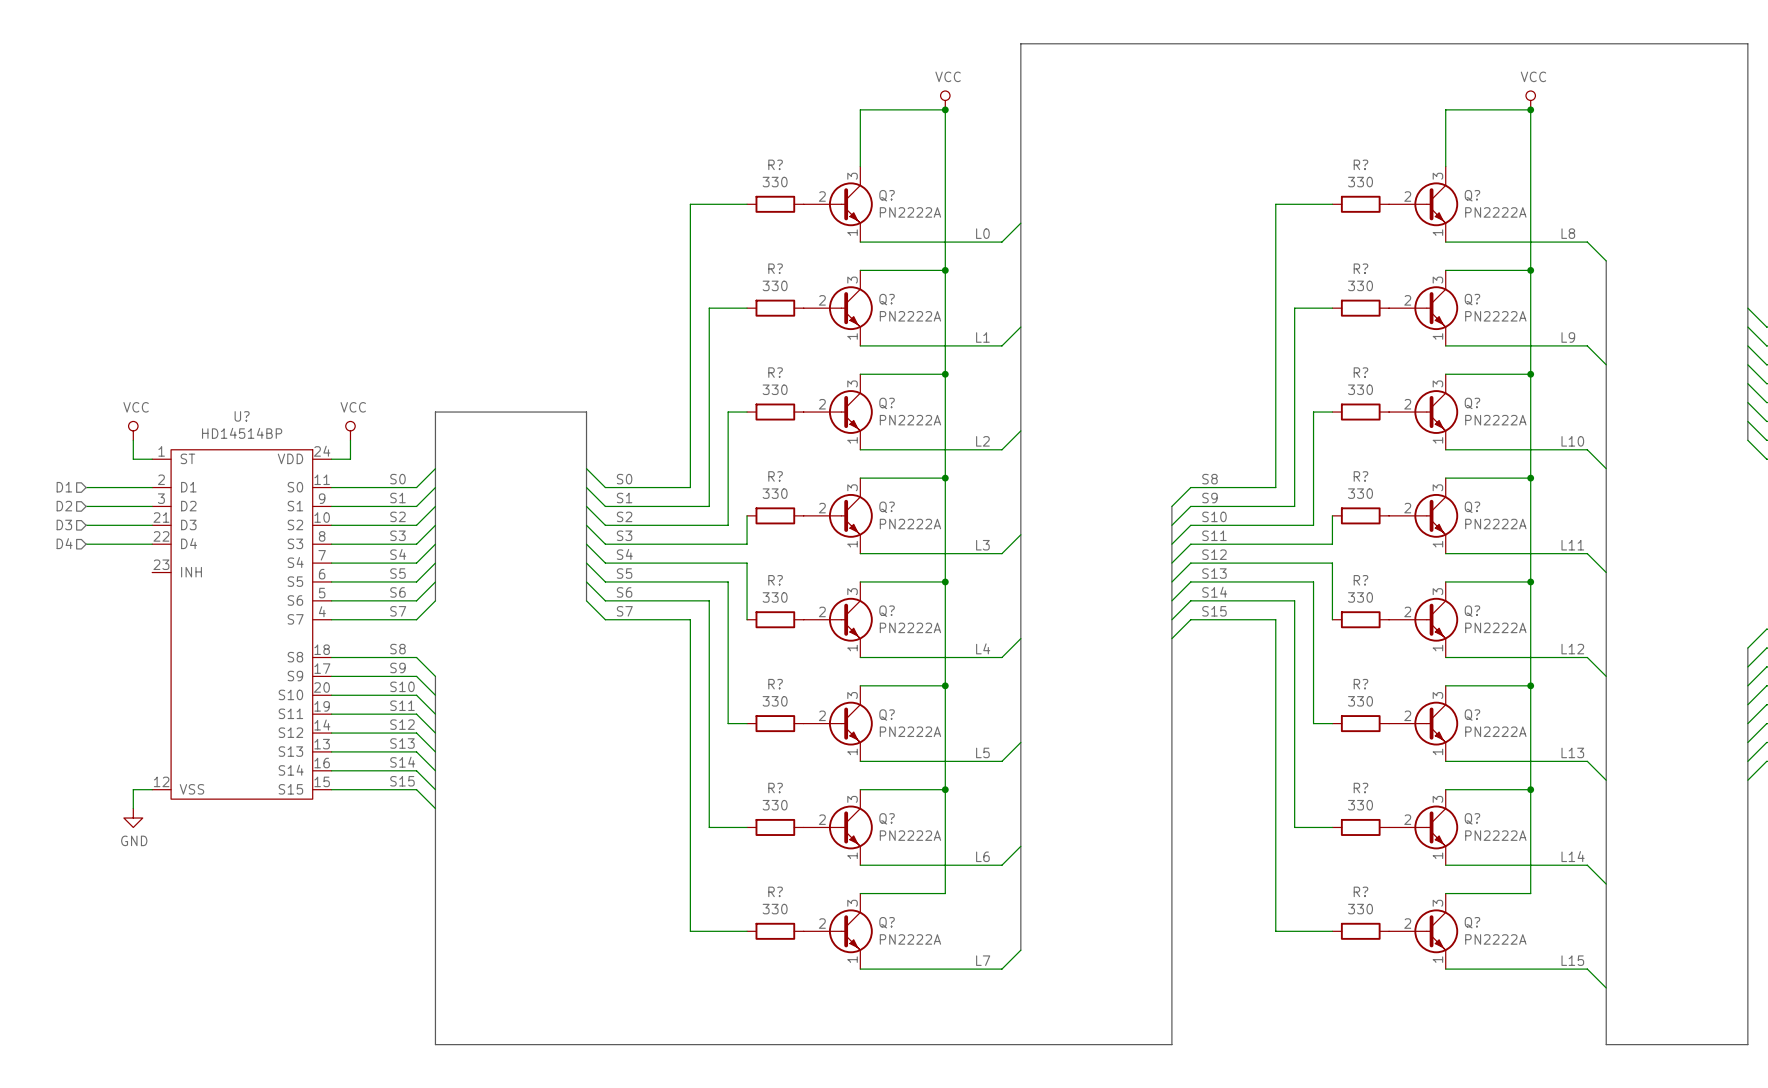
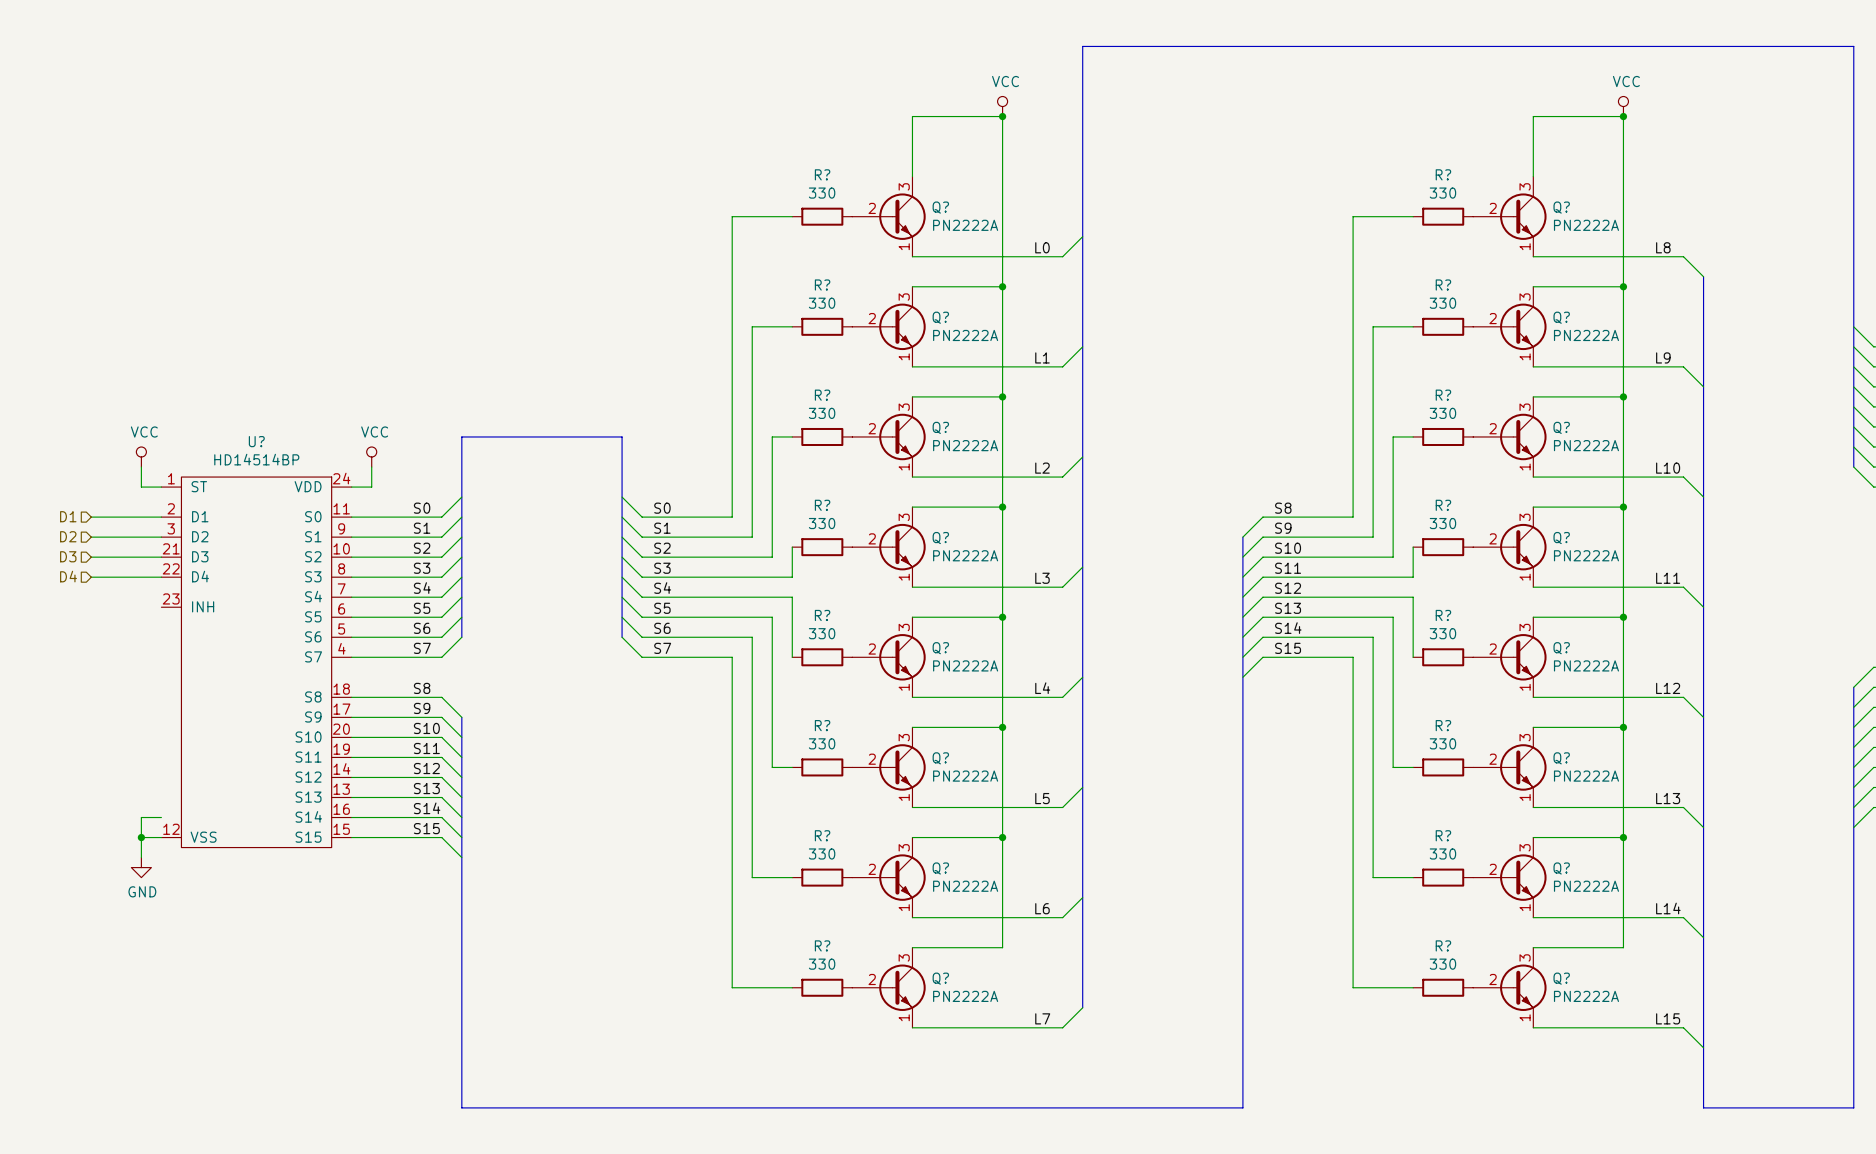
wire: none -> (161, 817) (141, 817) (141, 837)
junction: none -> (141, 837)

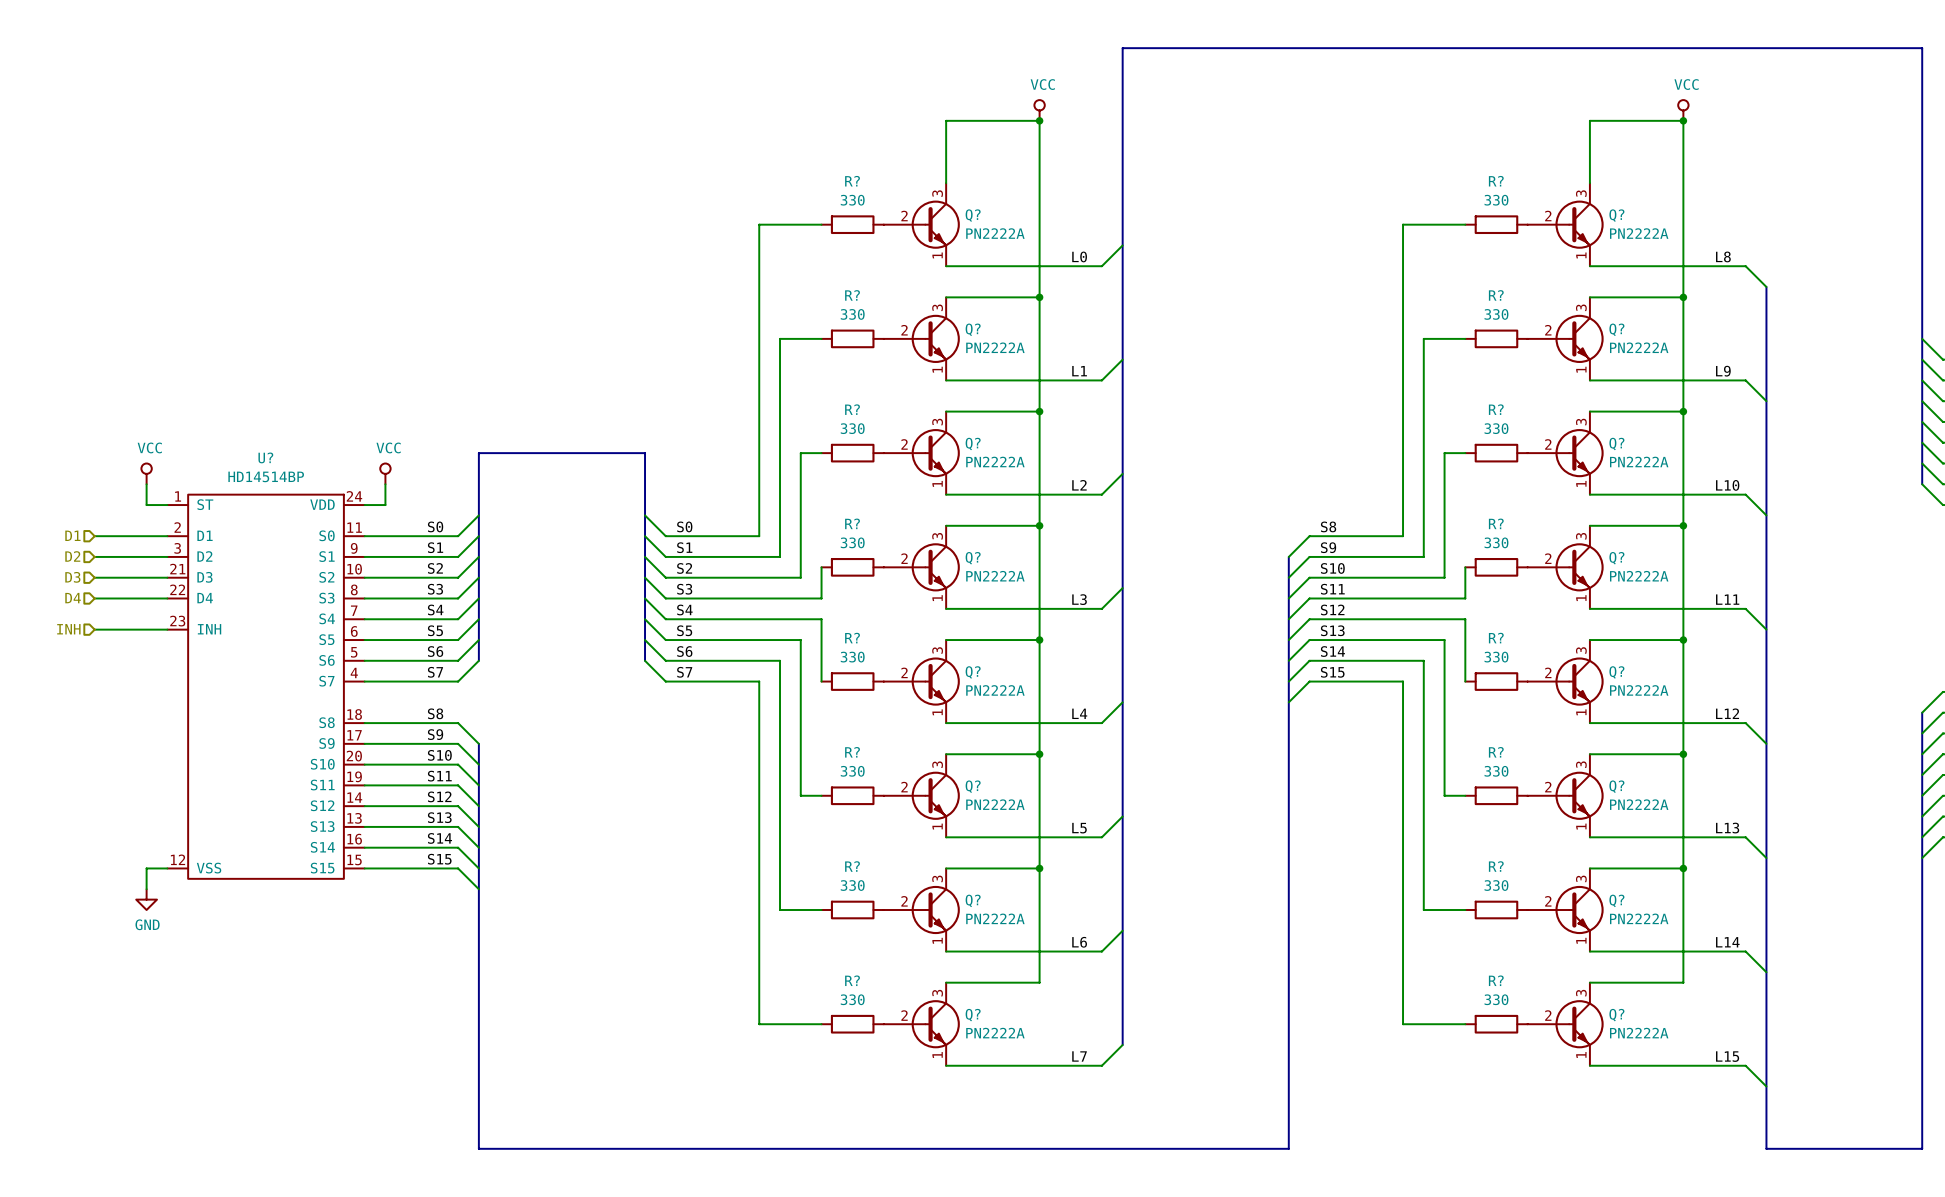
hierarchical label: none -> INH (68, 629)
wire: none -> (94, 629) (167, 629)
wire: (161, 817) (141, 817) (141, 837) -> none
junction: (141, 837) -> none

